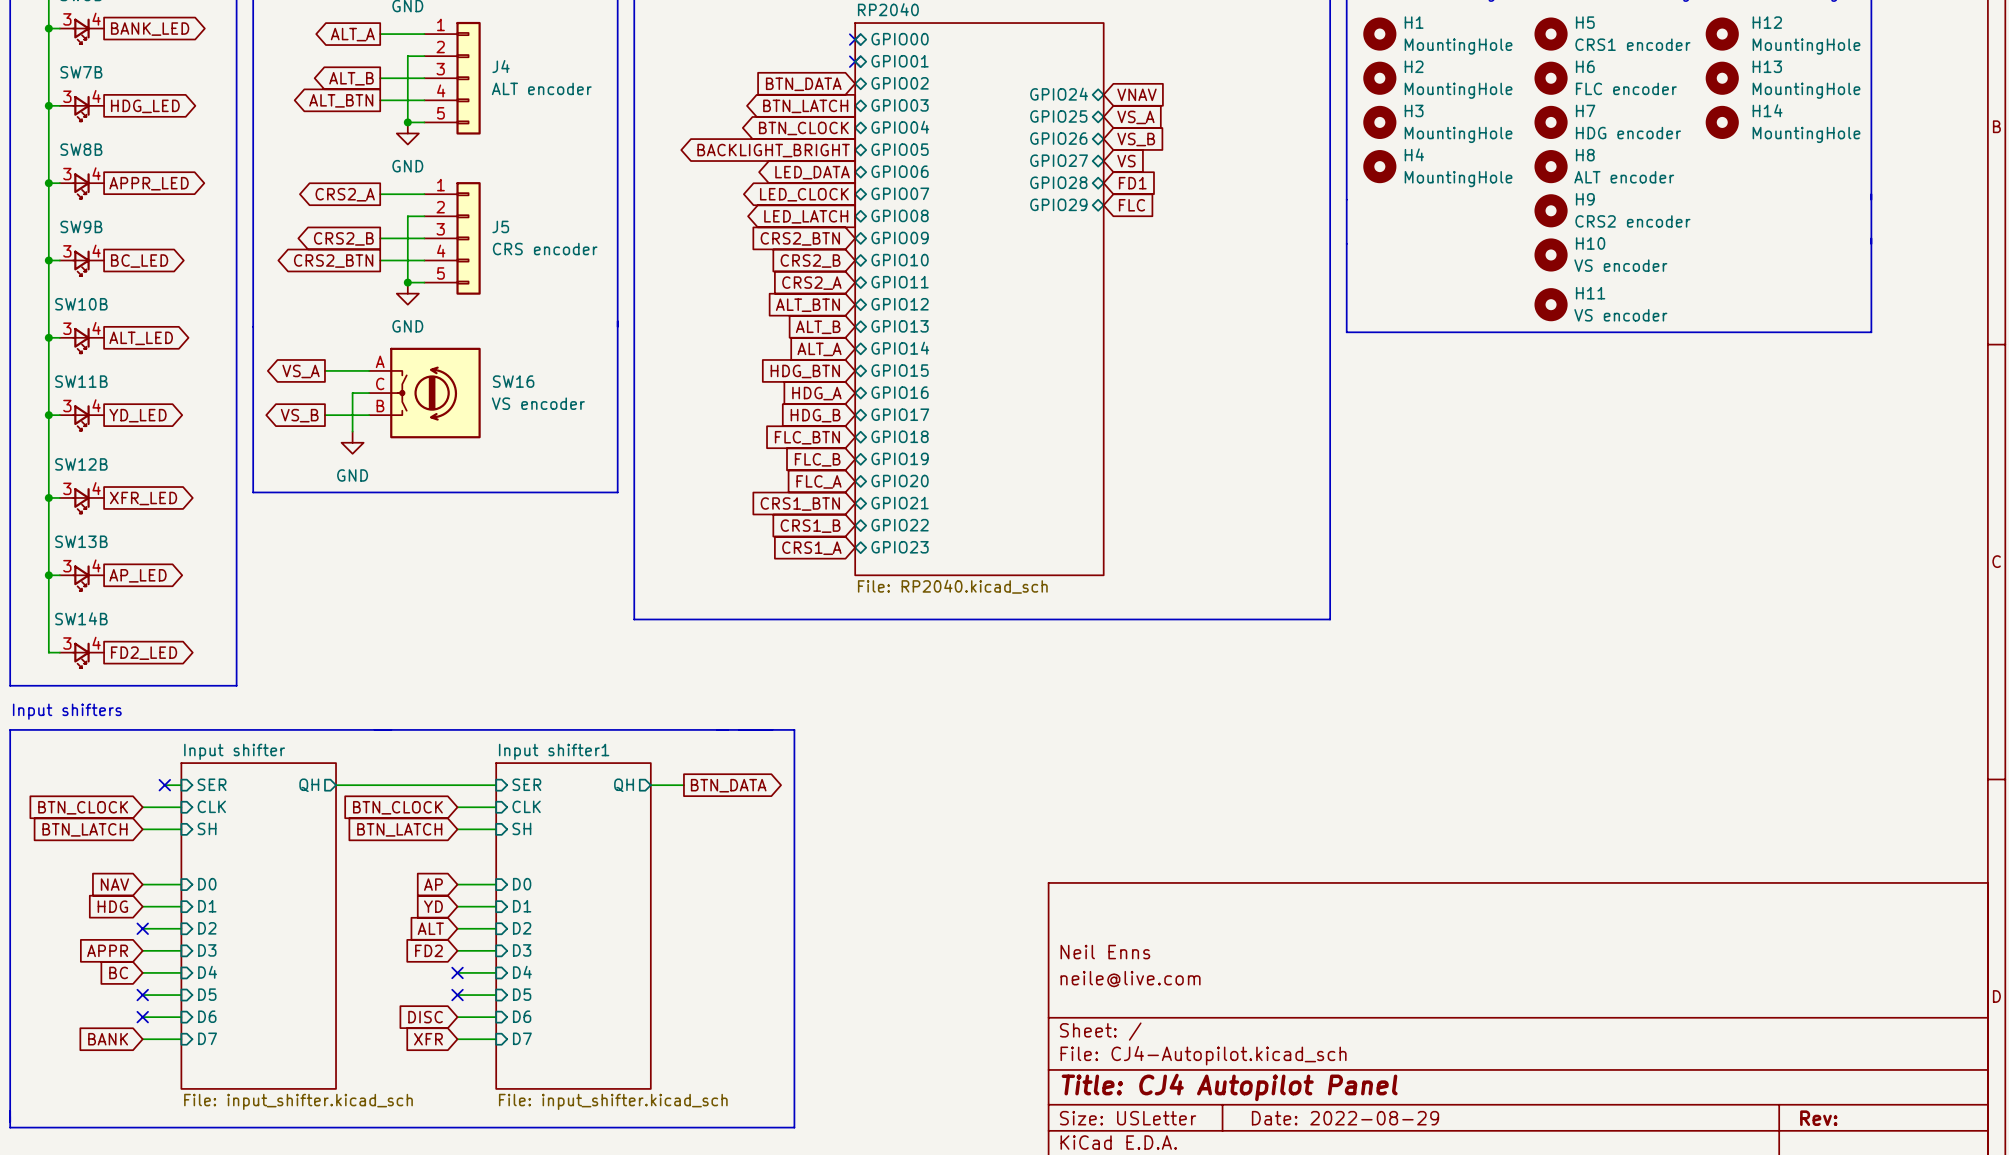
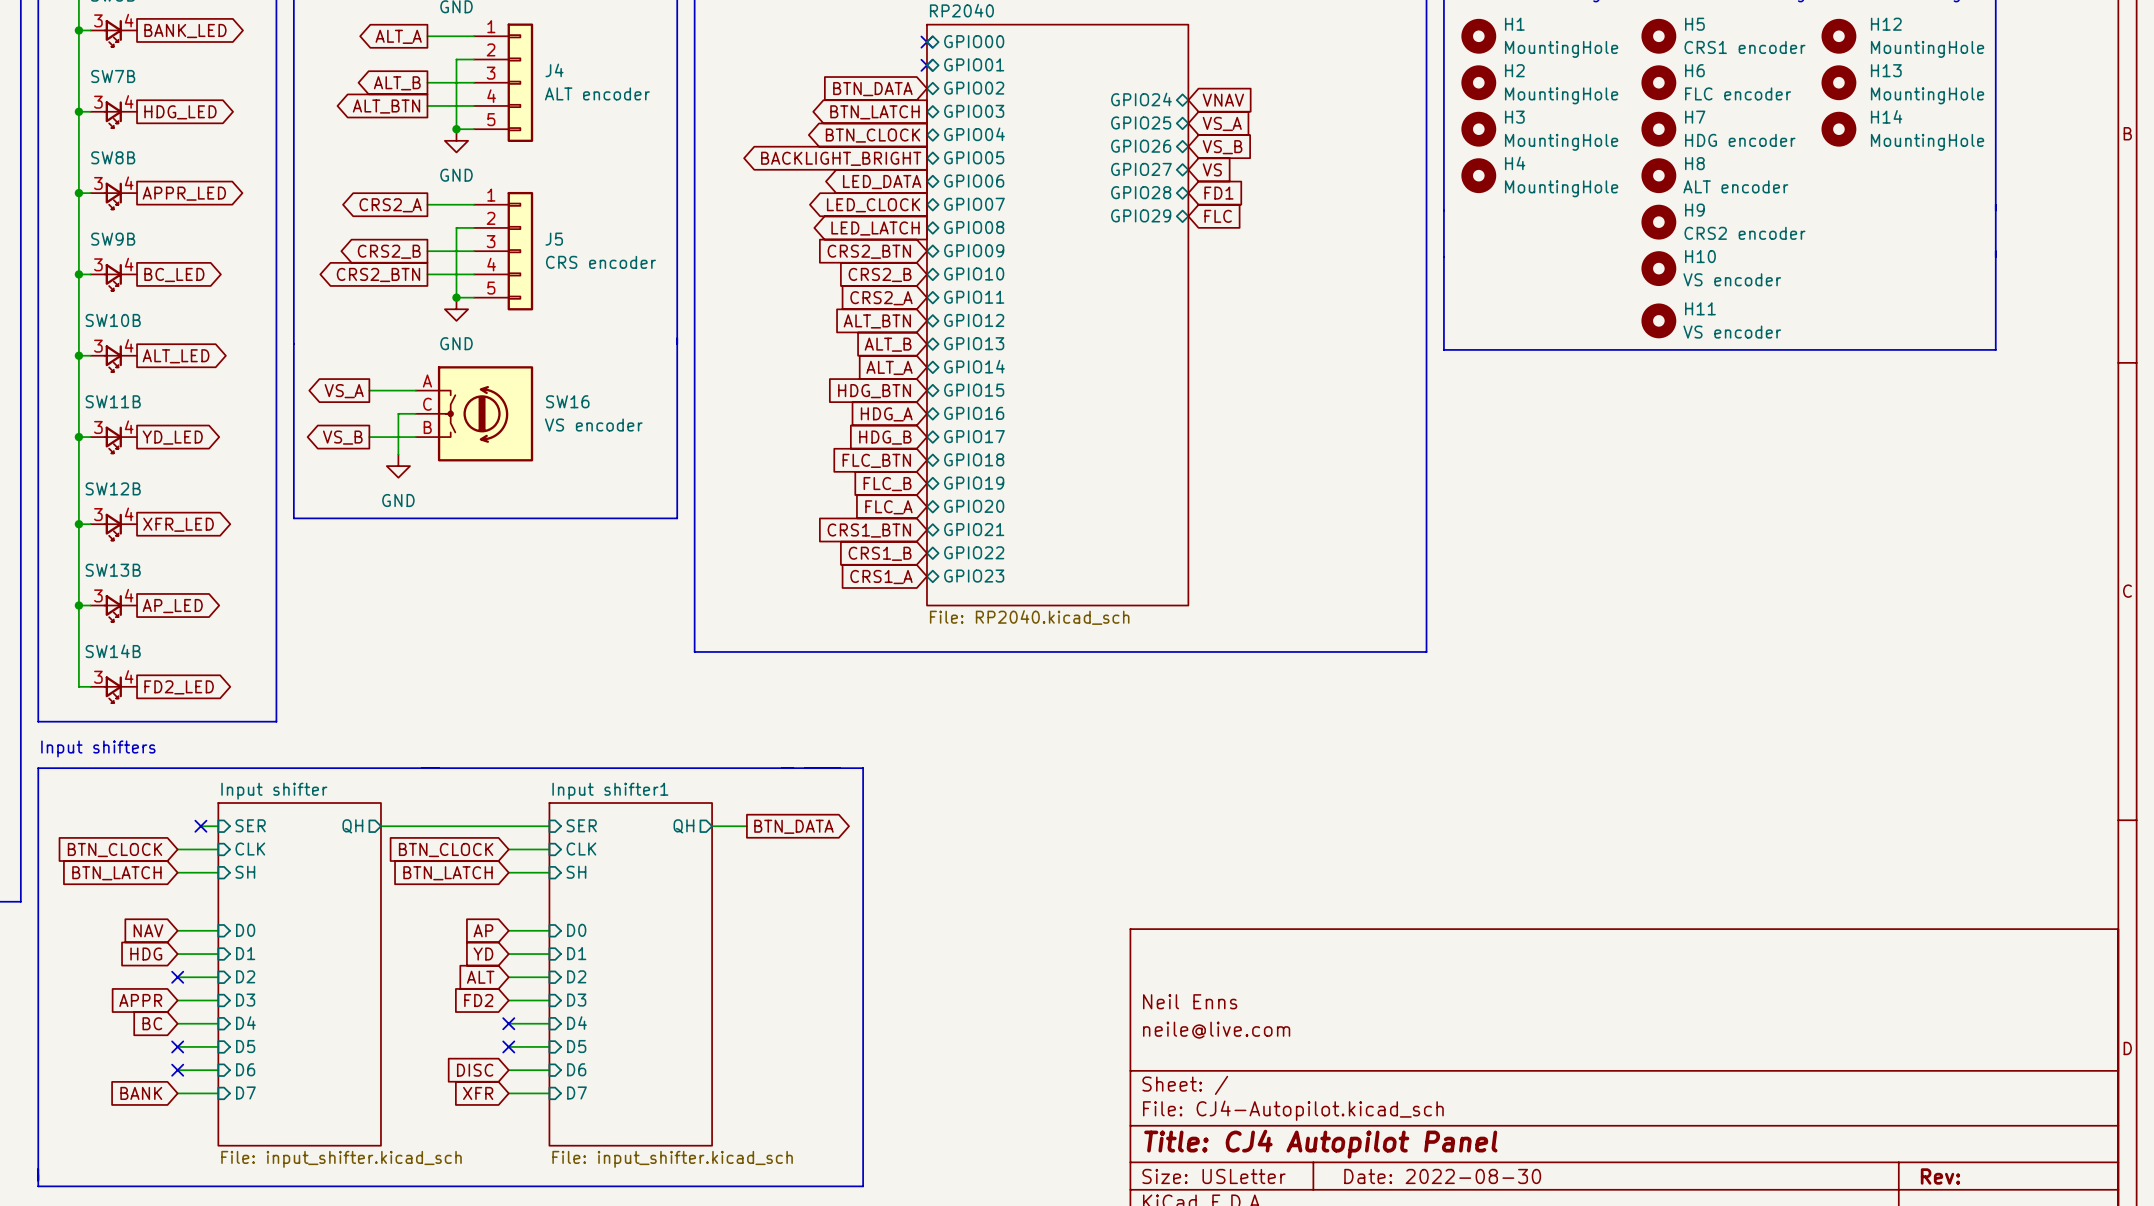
title block: Date: 2022-08-29 (1345, 1118) -> Date: 2022-08-30 (1442, 1176)

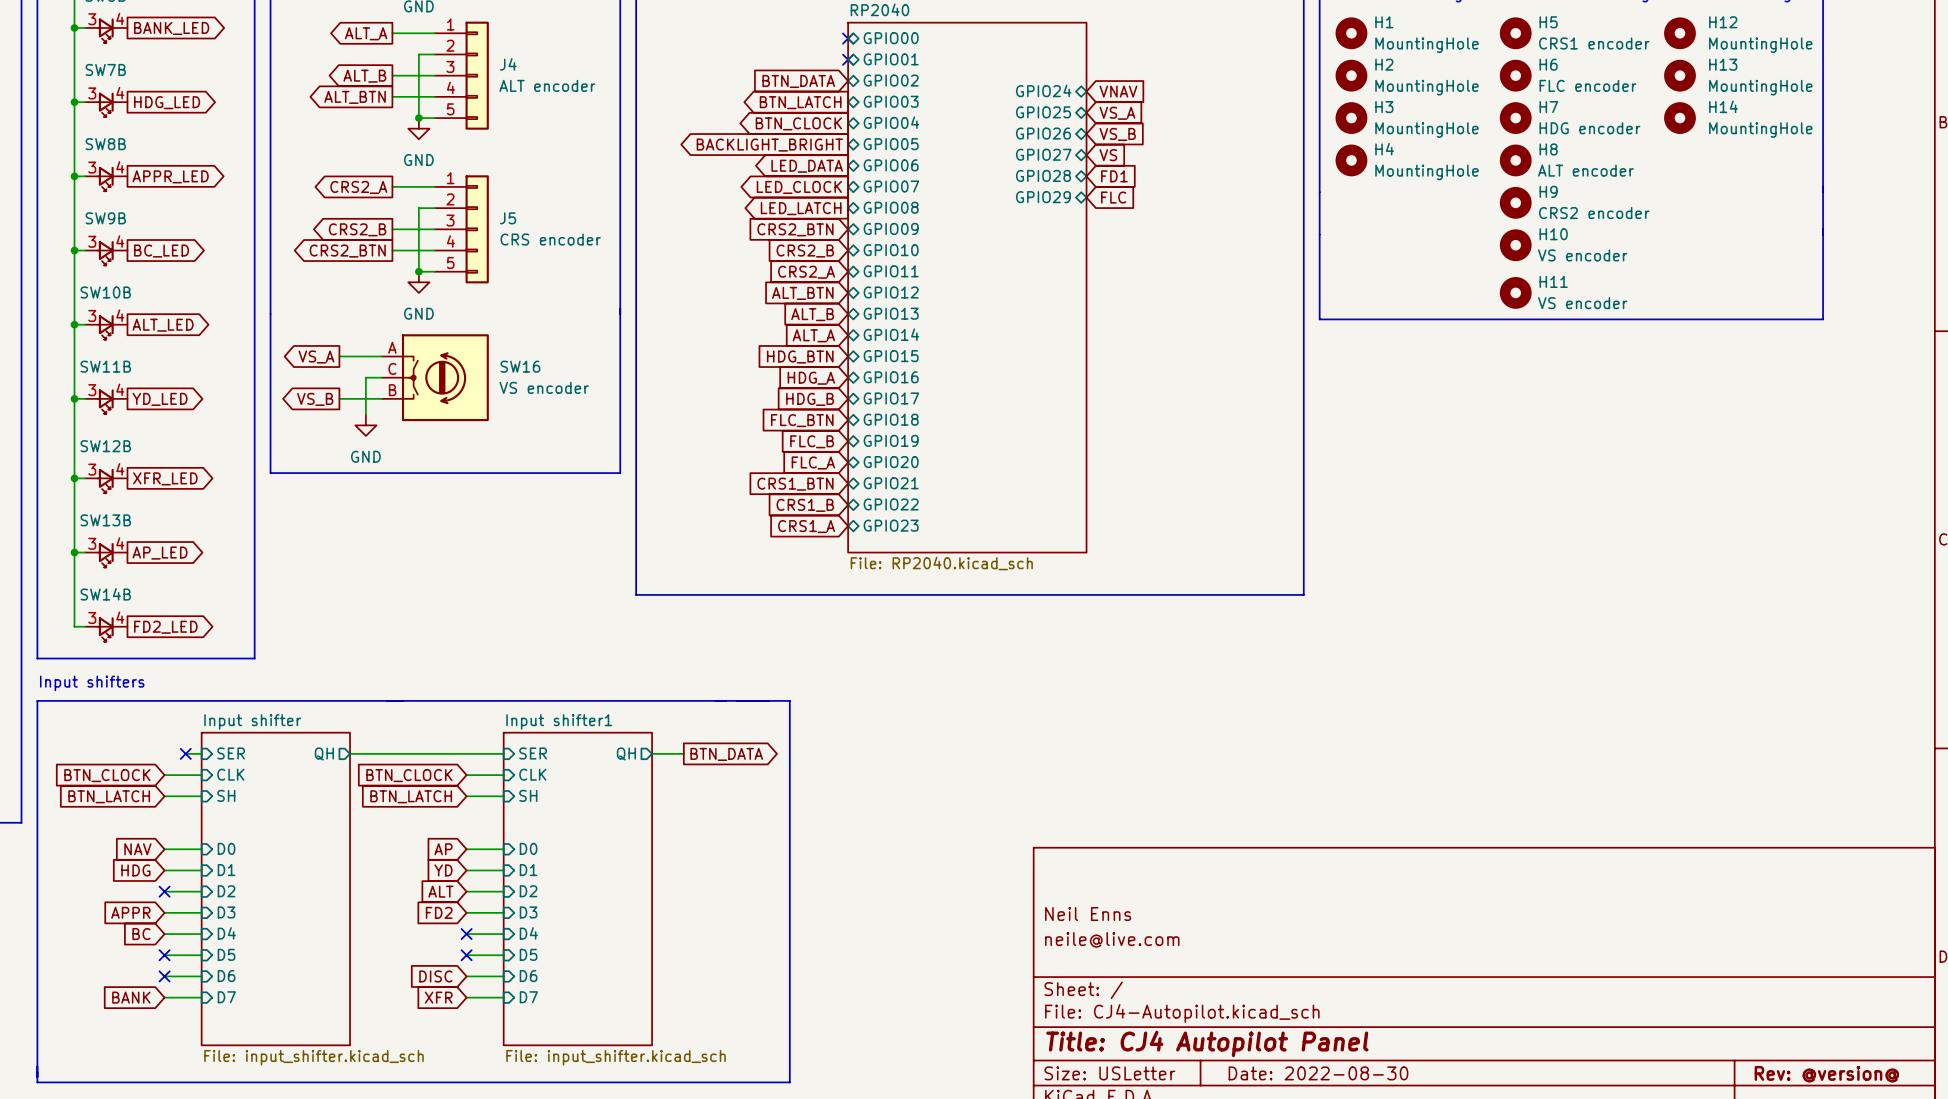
title block: Rev: (1940, 1176) -> Rev: @version@ (1826, 1074)

